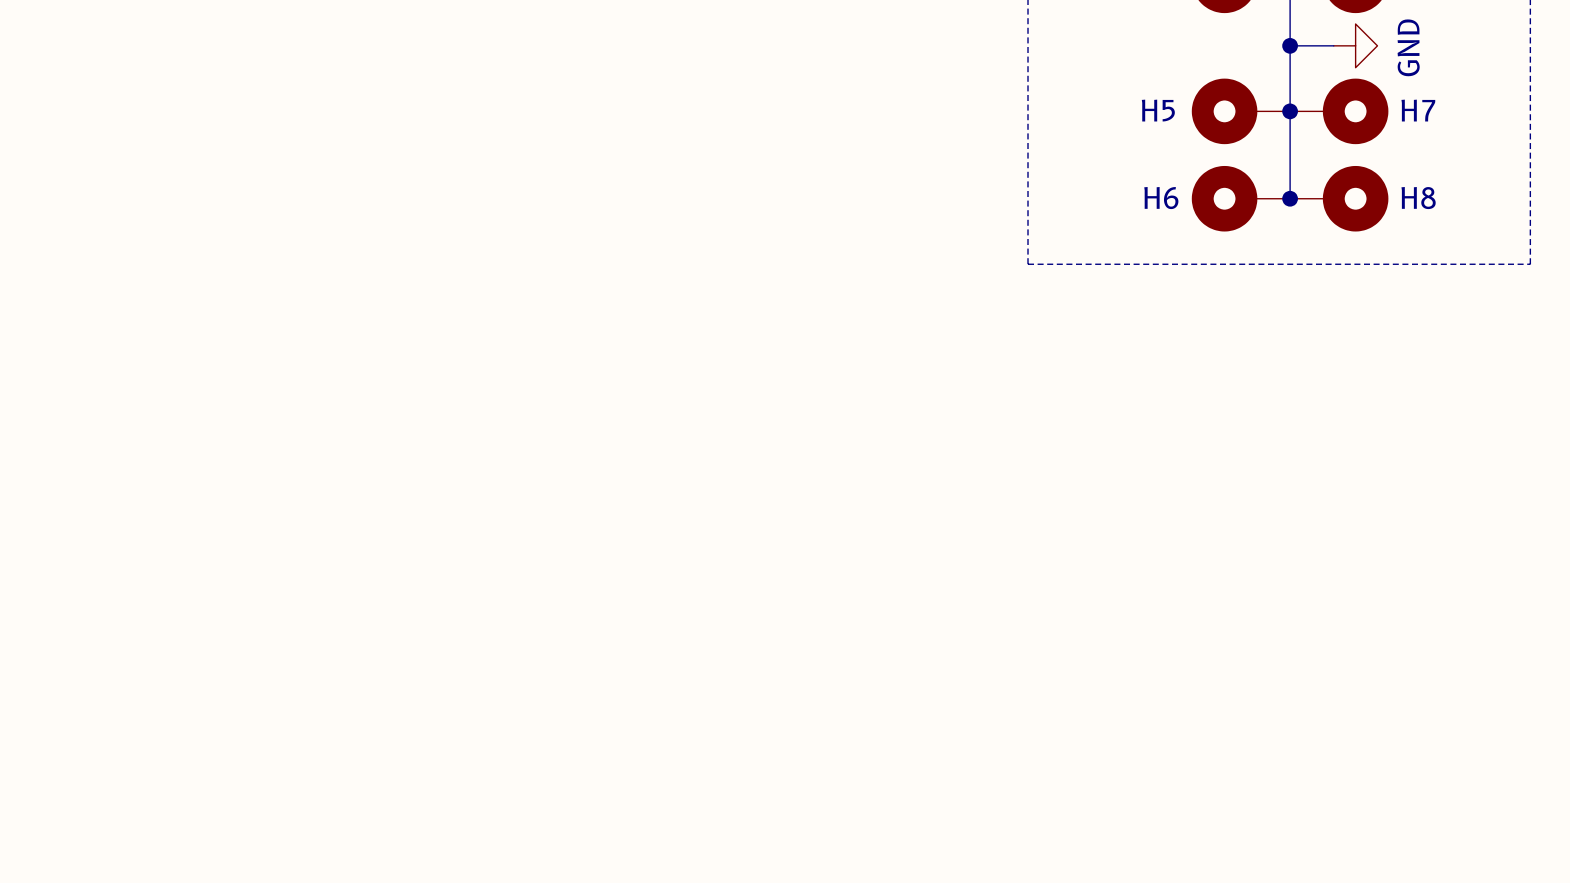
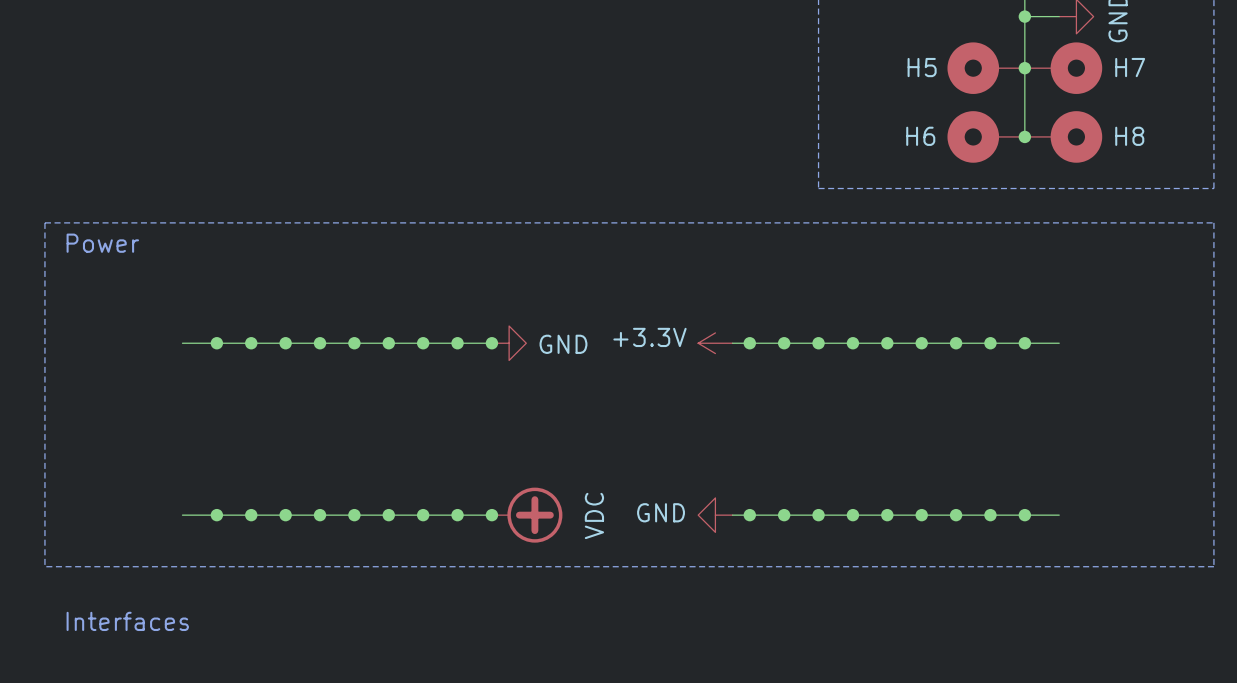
line: none -> (44, 222) (1213, 222) (1213, 566) (44, 566) (44, 222)
text: none -> Power (102, 243)
wire: none -> (182, 343) (491, 343)
junction: none -> (216, 343)
junction: none -> (251, 343)
junction: none -> (285, 343)
junction: none -> (320, 343)
junction: none -> (354, 343)
junction: none -> (388, 343)
junction: none -> (423, 343)
junction: none -> (457, 343)
junction: none -> (491, 343)
power symbol: none -> GND (509, 343)
power symbol: none -> +3.3V (715, 343)
wire: none -> (732, 343) (1059, 343)
junction: none -> (749, 343)
junction: none -> (784, 343)
junction: none -> (818, 343)
junction: none -> (852, 343)
junction: none -> (887, 343)
junction: none -> (921, 343)
junction: none -> (956, 343)
junction: none -> (990, 343)
junction: none -> (1024, 343)
wire: none -> (182, 515) (491, 515)
junction: none -> (216, 515)
junction: none -> (251, 515)
junction: none -> (285, 515)
junction: none -> (320, 515)
junction: none -> (354, 515)
junction: none -> (388, 515)
junction: none -> (423, 515)
junction: none -> (457, 515)
junction: none -> (491, 515)
power symbol: none -> VDC (527, 515)
power symbol: none -> GND (715, 515)
wire: none -> (732, 515) (1059, 515)
junction: none -> (749, 515)
junction: none -> (784, 515)
junction: none -> (818, 515)
junction: none -> (852, 515)
junction: none -> (887, 515)
junction: none -> (921, 515)
junction: none -> (956, 515)
junction: none -> (990, 515)
junction: none -> (1024, 515)
text: none -> Interfaces (127, 621)

